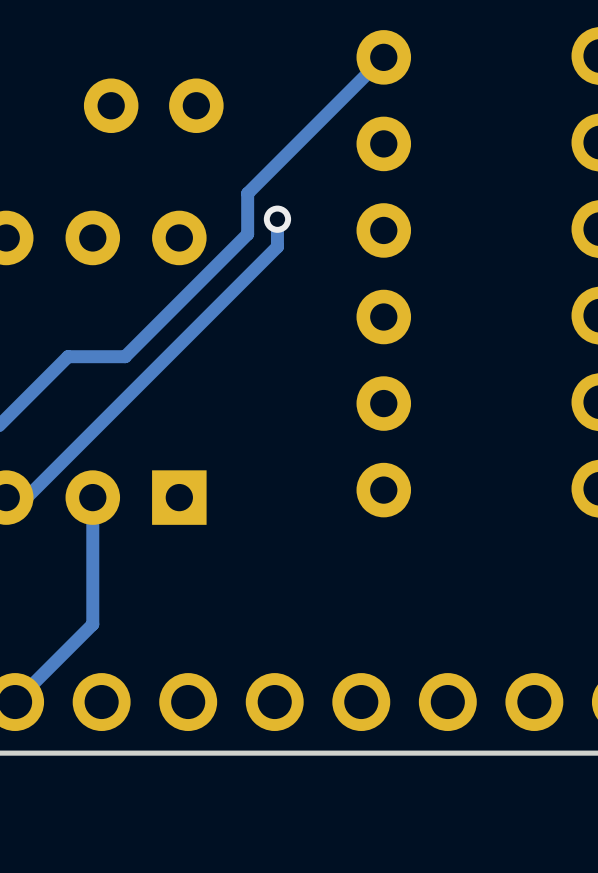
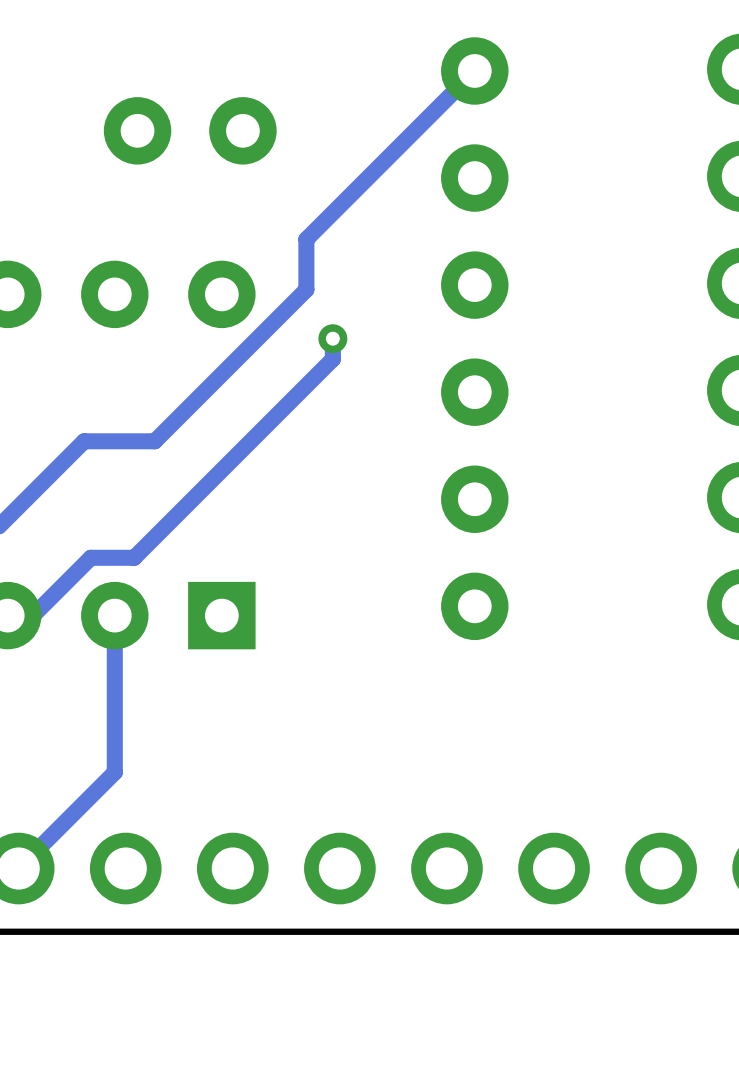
track: (277, 219) (277, 246) (73, 450) -> (332, 338) (332, 359) (134, 557) (90, 557)
via: (277, 219) -> none
via: none -> (332, 338)

